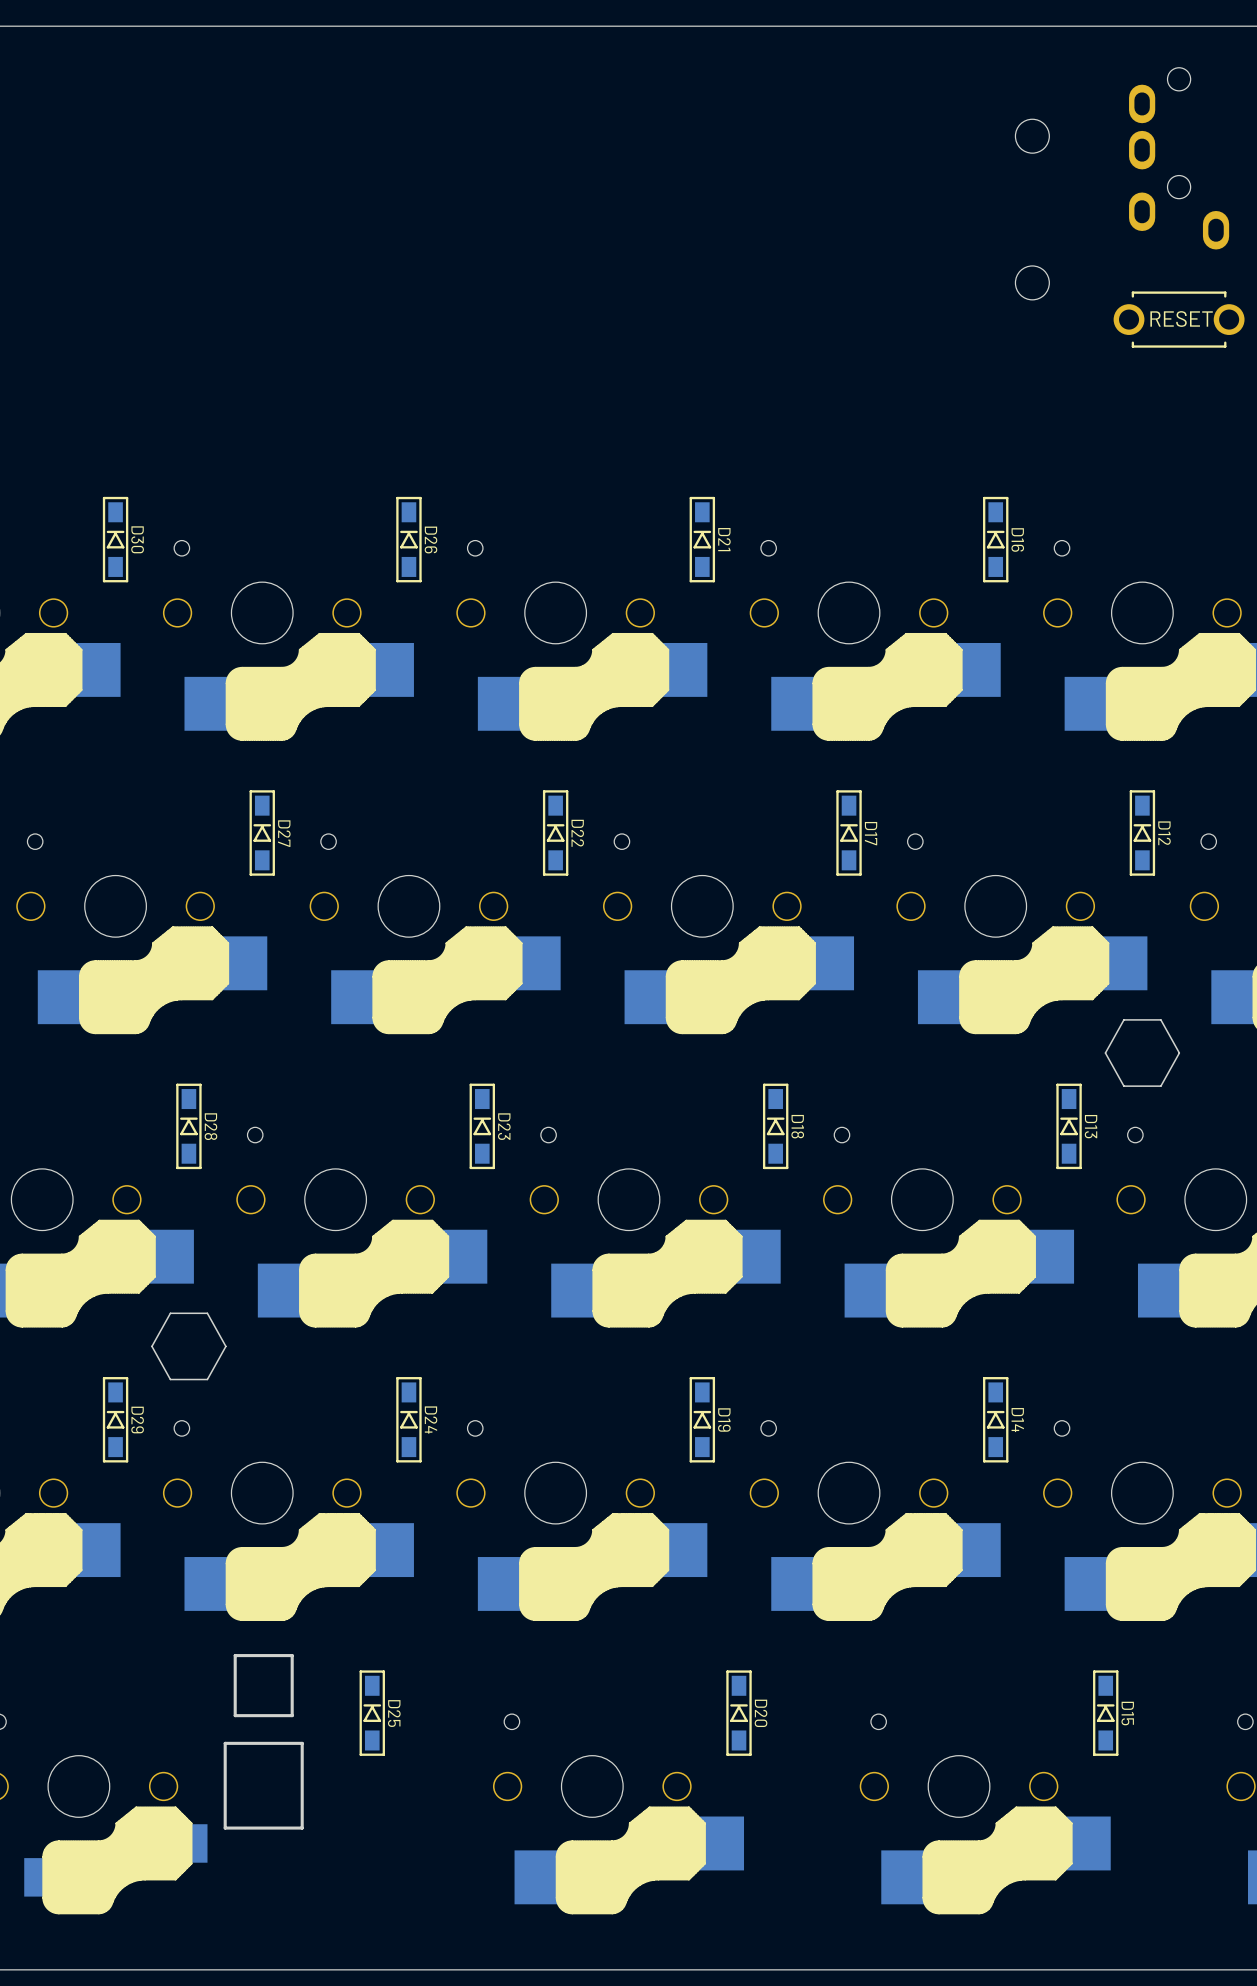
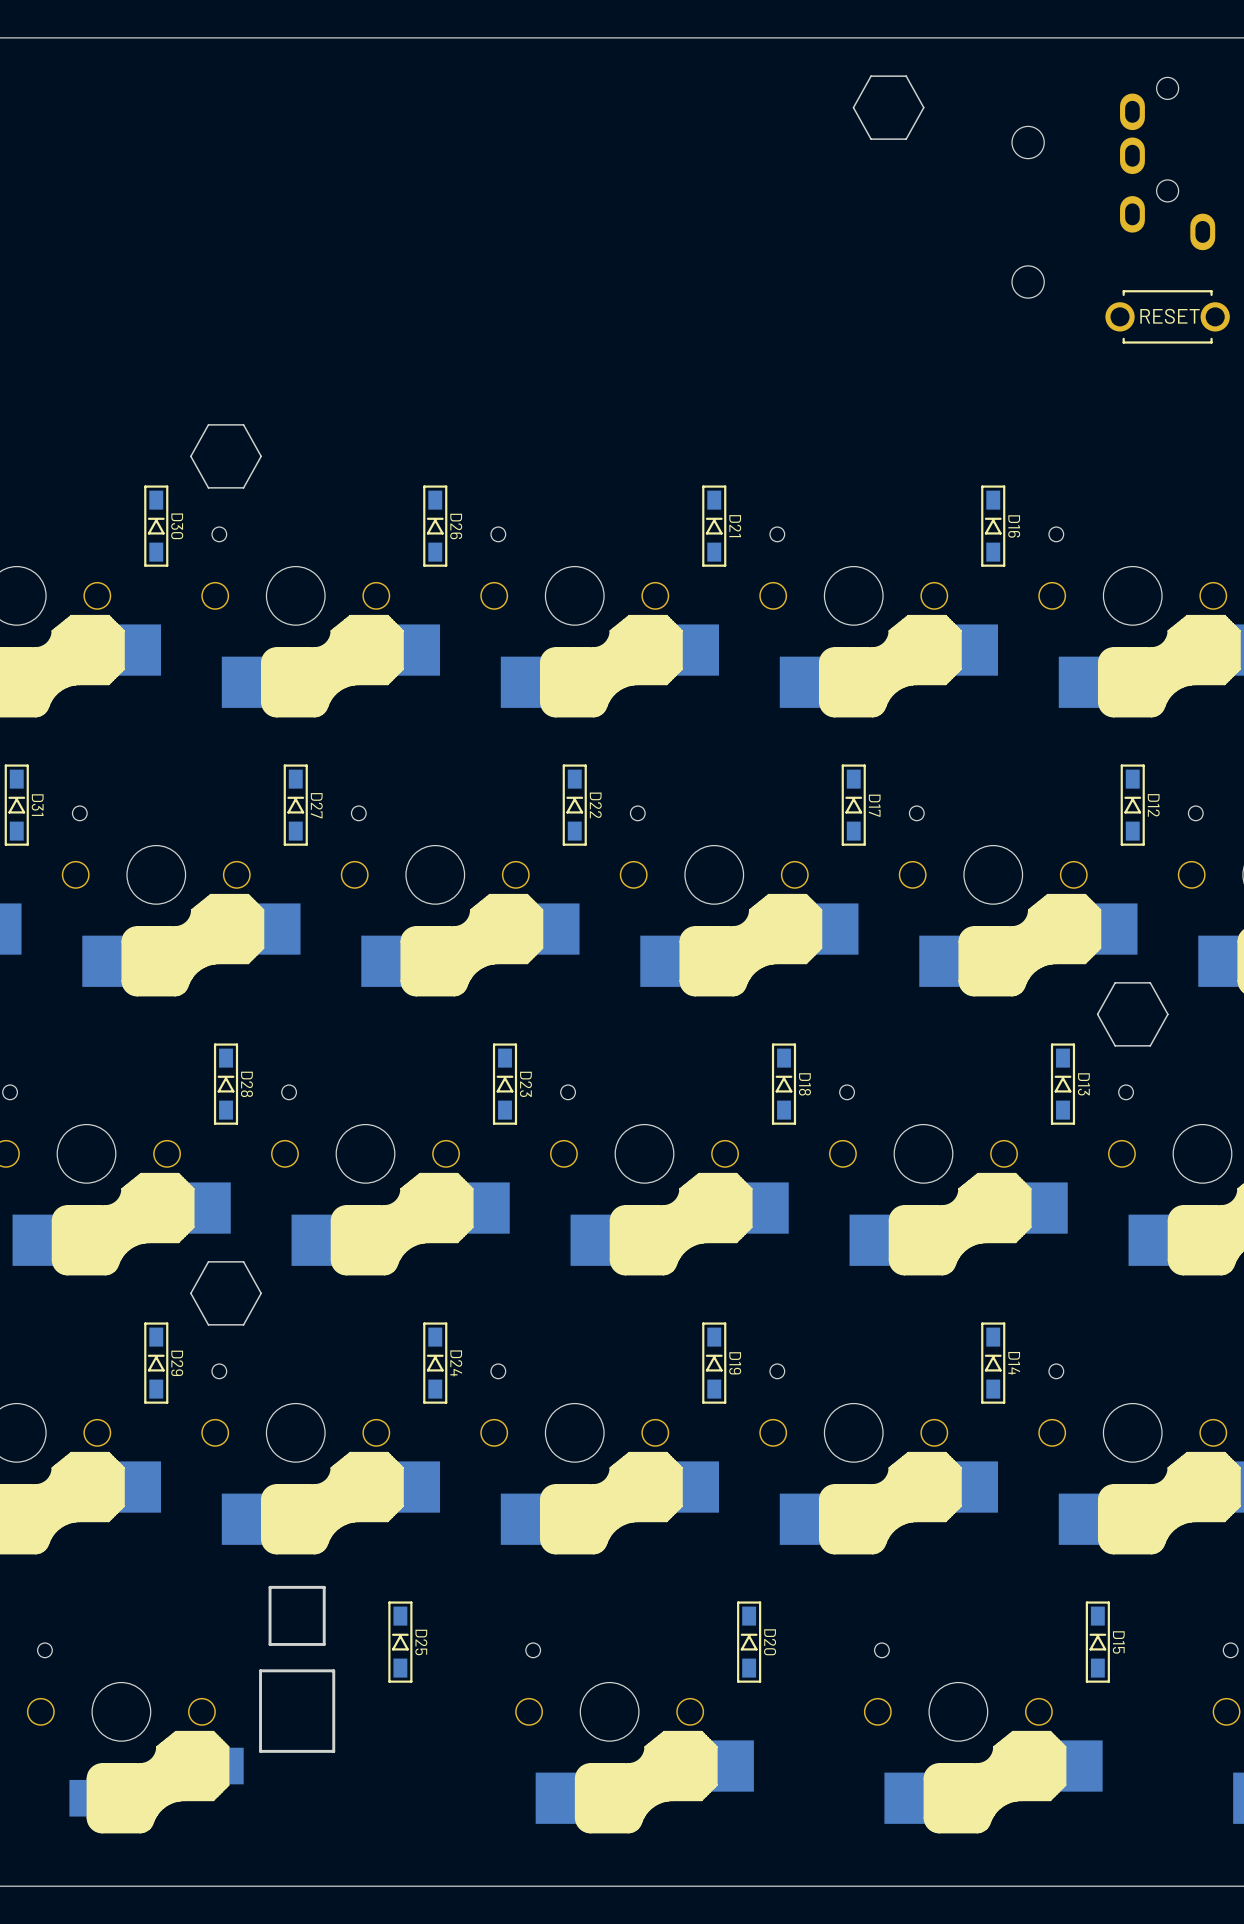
drawing: none -> [852, 75, 925, 140]
drawing: none -> [190, 424, 262, 489]

